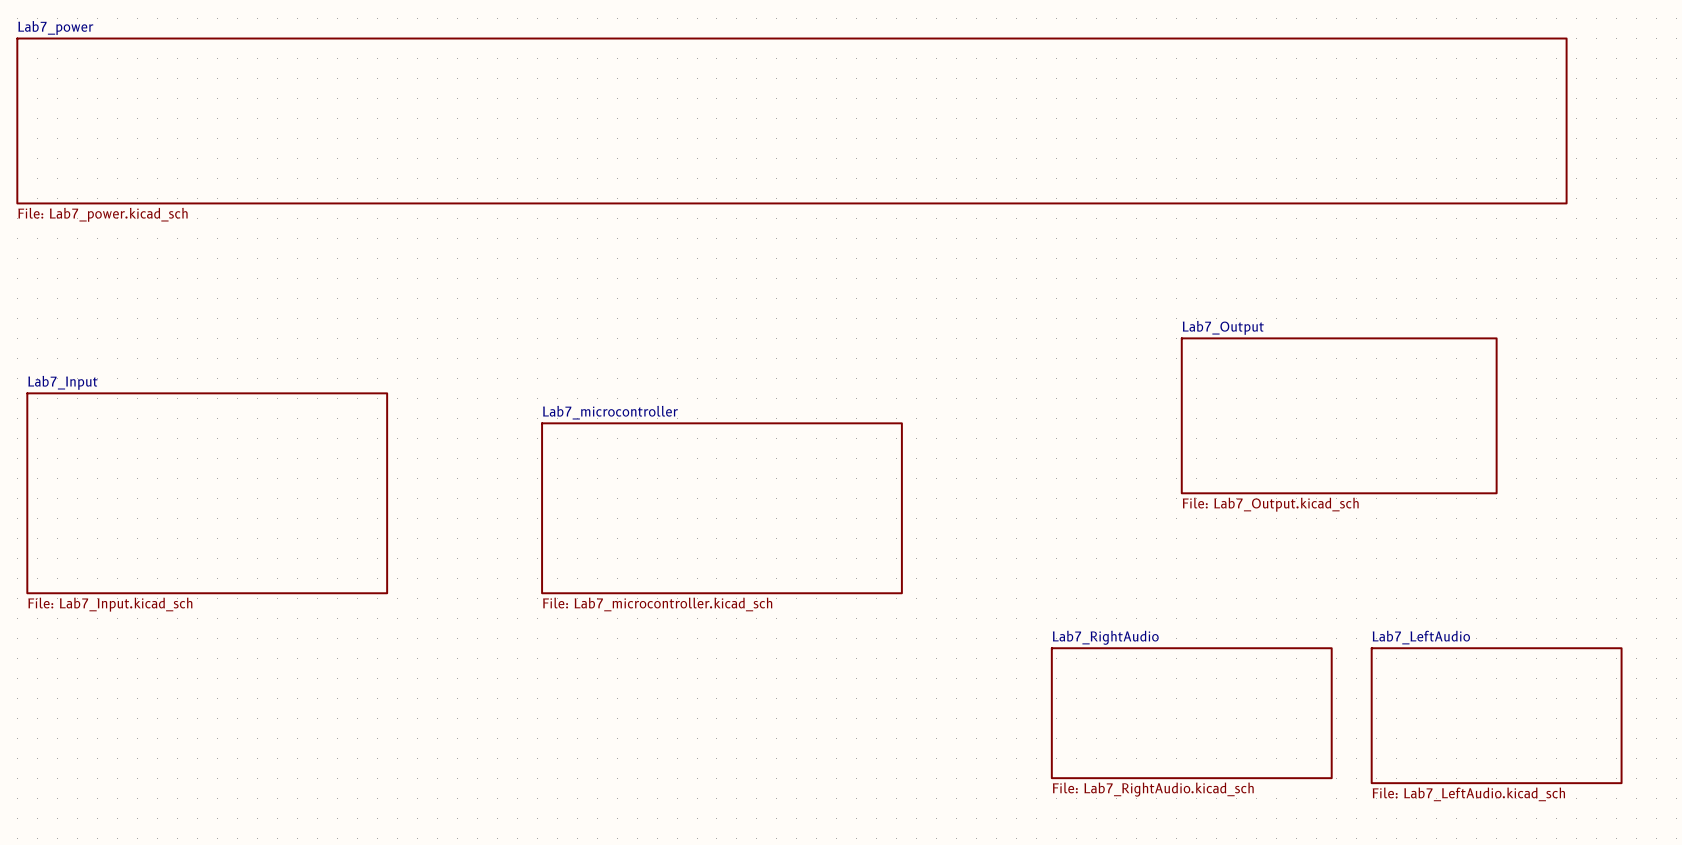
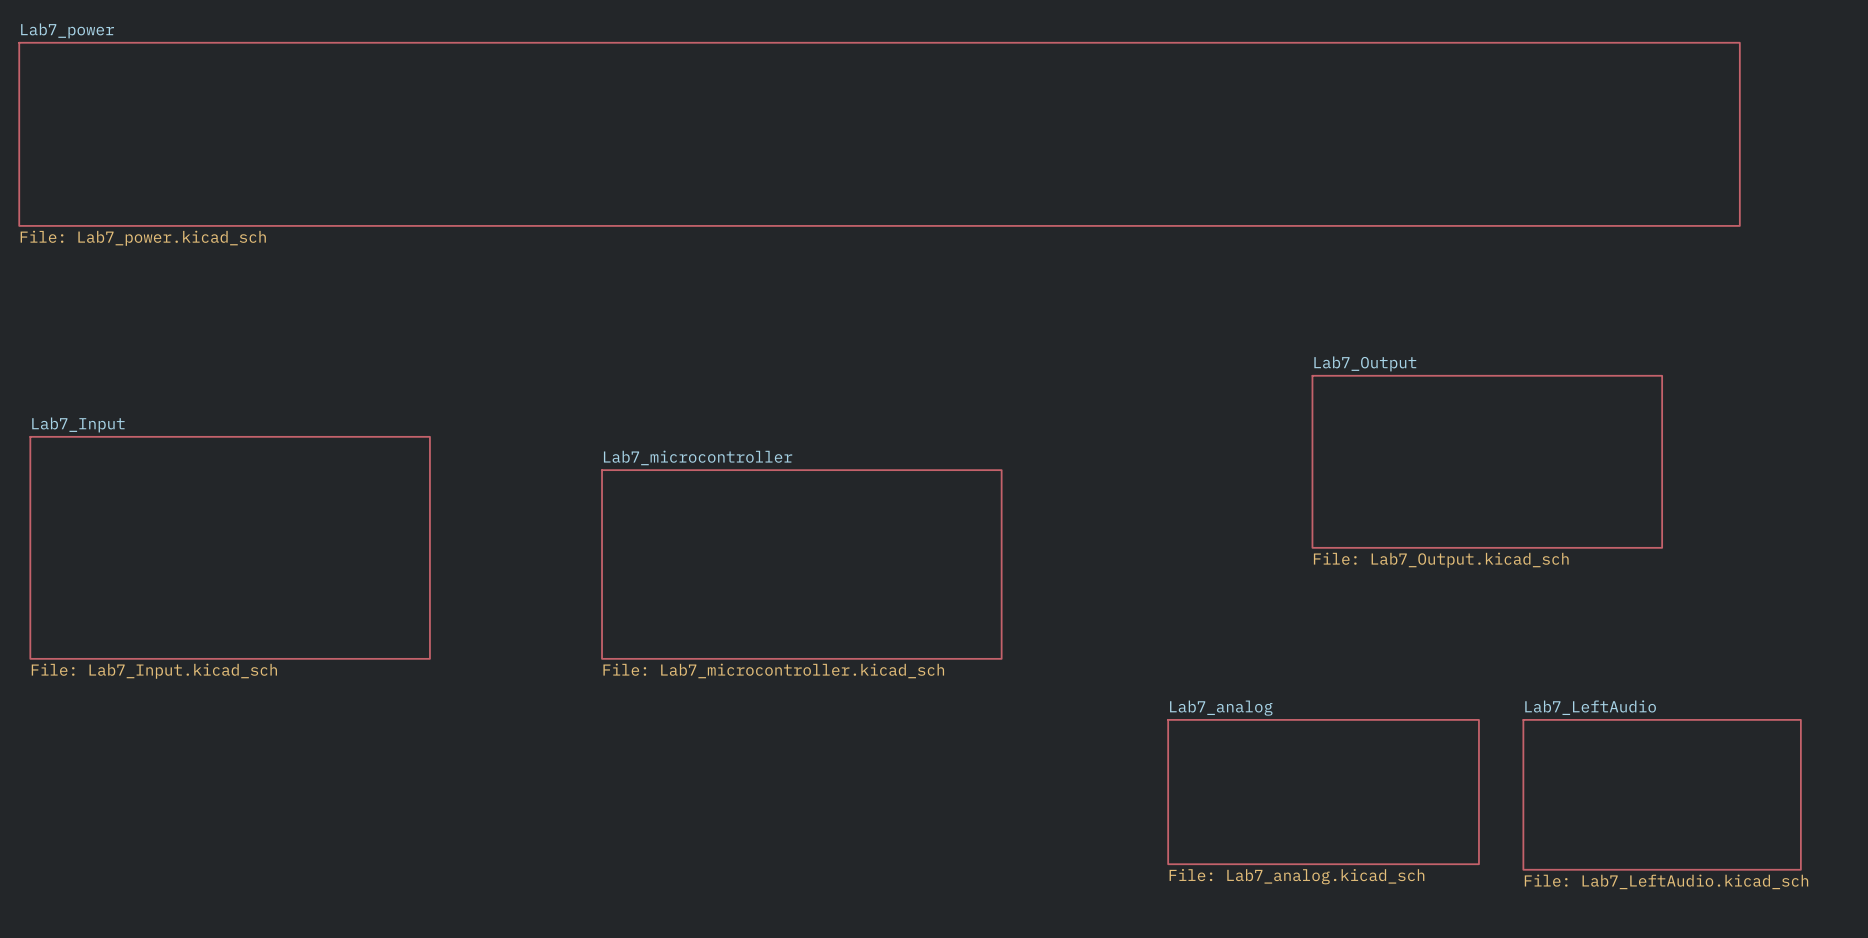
sheet Lab7_RightAudio name: Lab7_RightAudio (1105, 637) -> Lab7_analog (1221, 708)
sheet Lab7_RightAudio value: File: Lab7_RightAudio.kicad_sch (1153, 789) -> File: Lab7_analog.kicad_sch (1296, 876)

